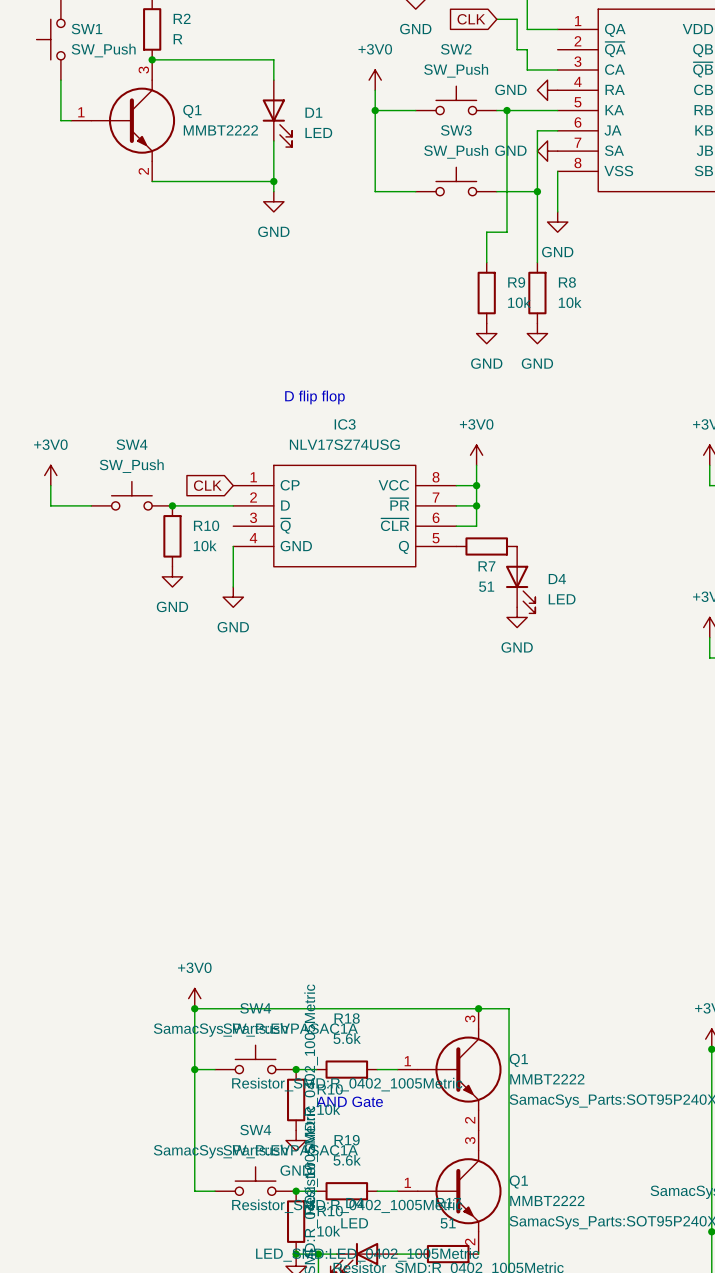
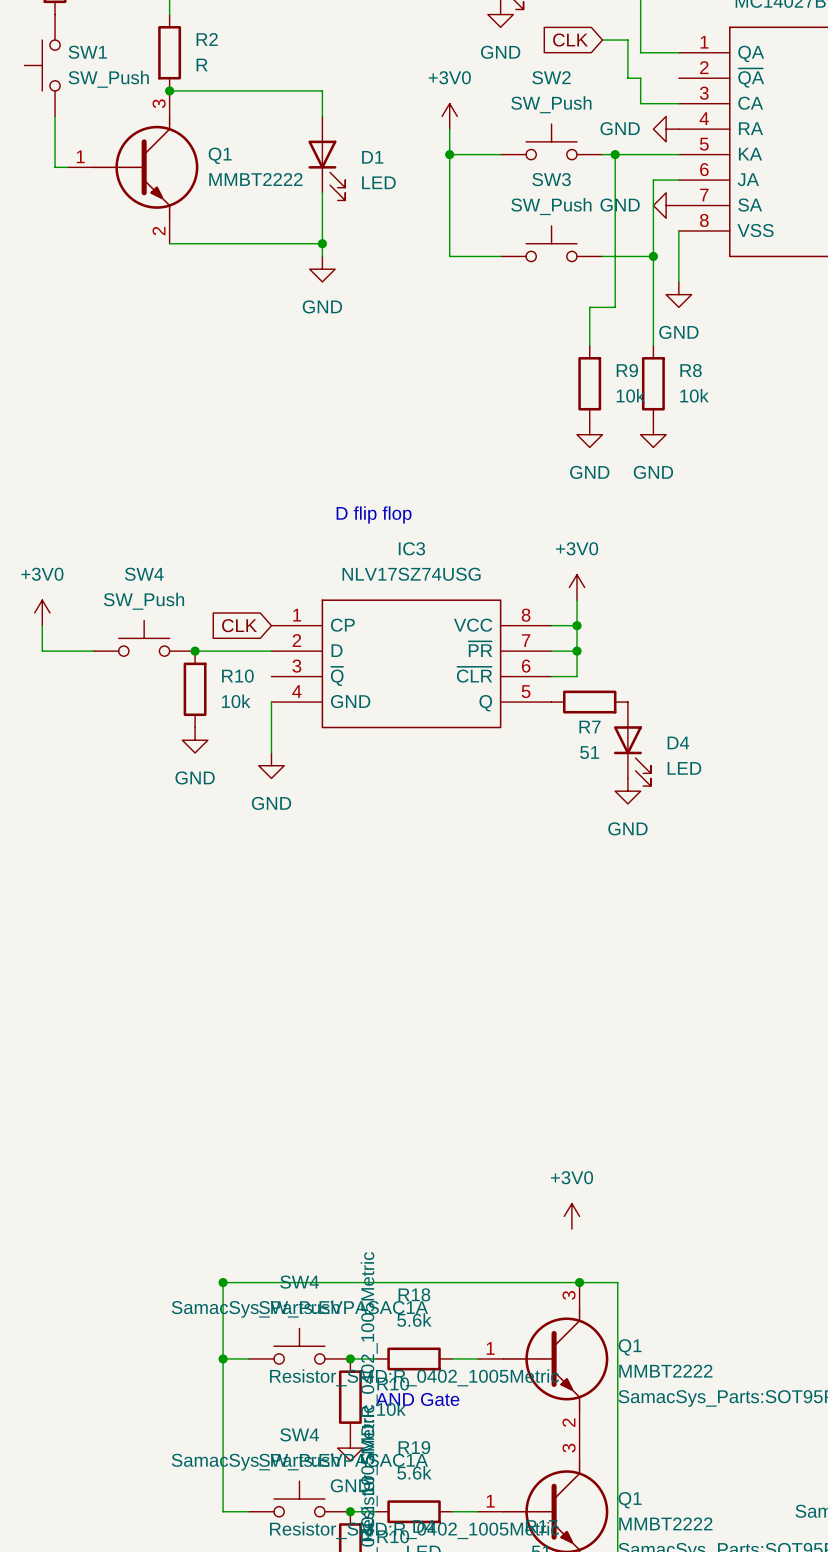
power symbol: none -> +3V0 (571, 1216)
power symbol: +3V0 (194, 998) -> none

